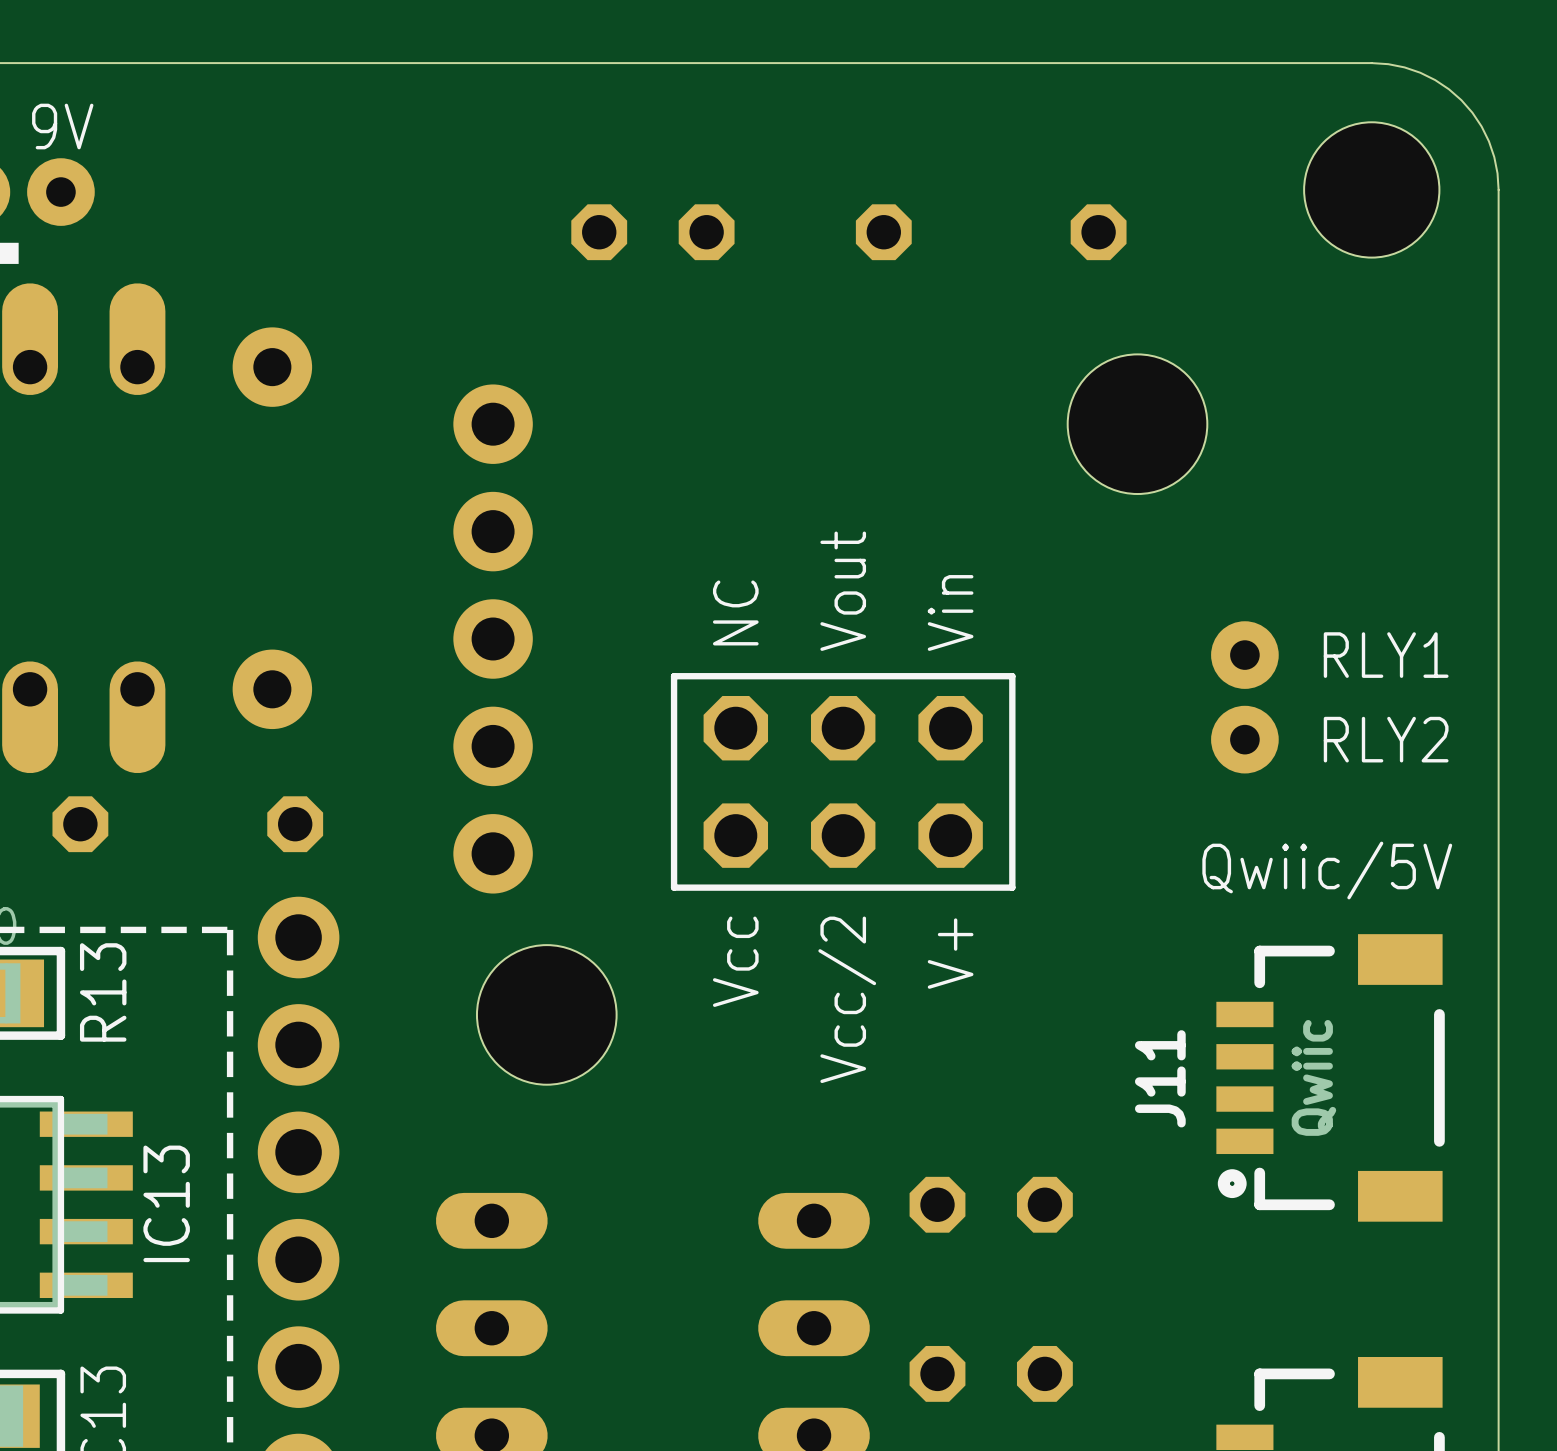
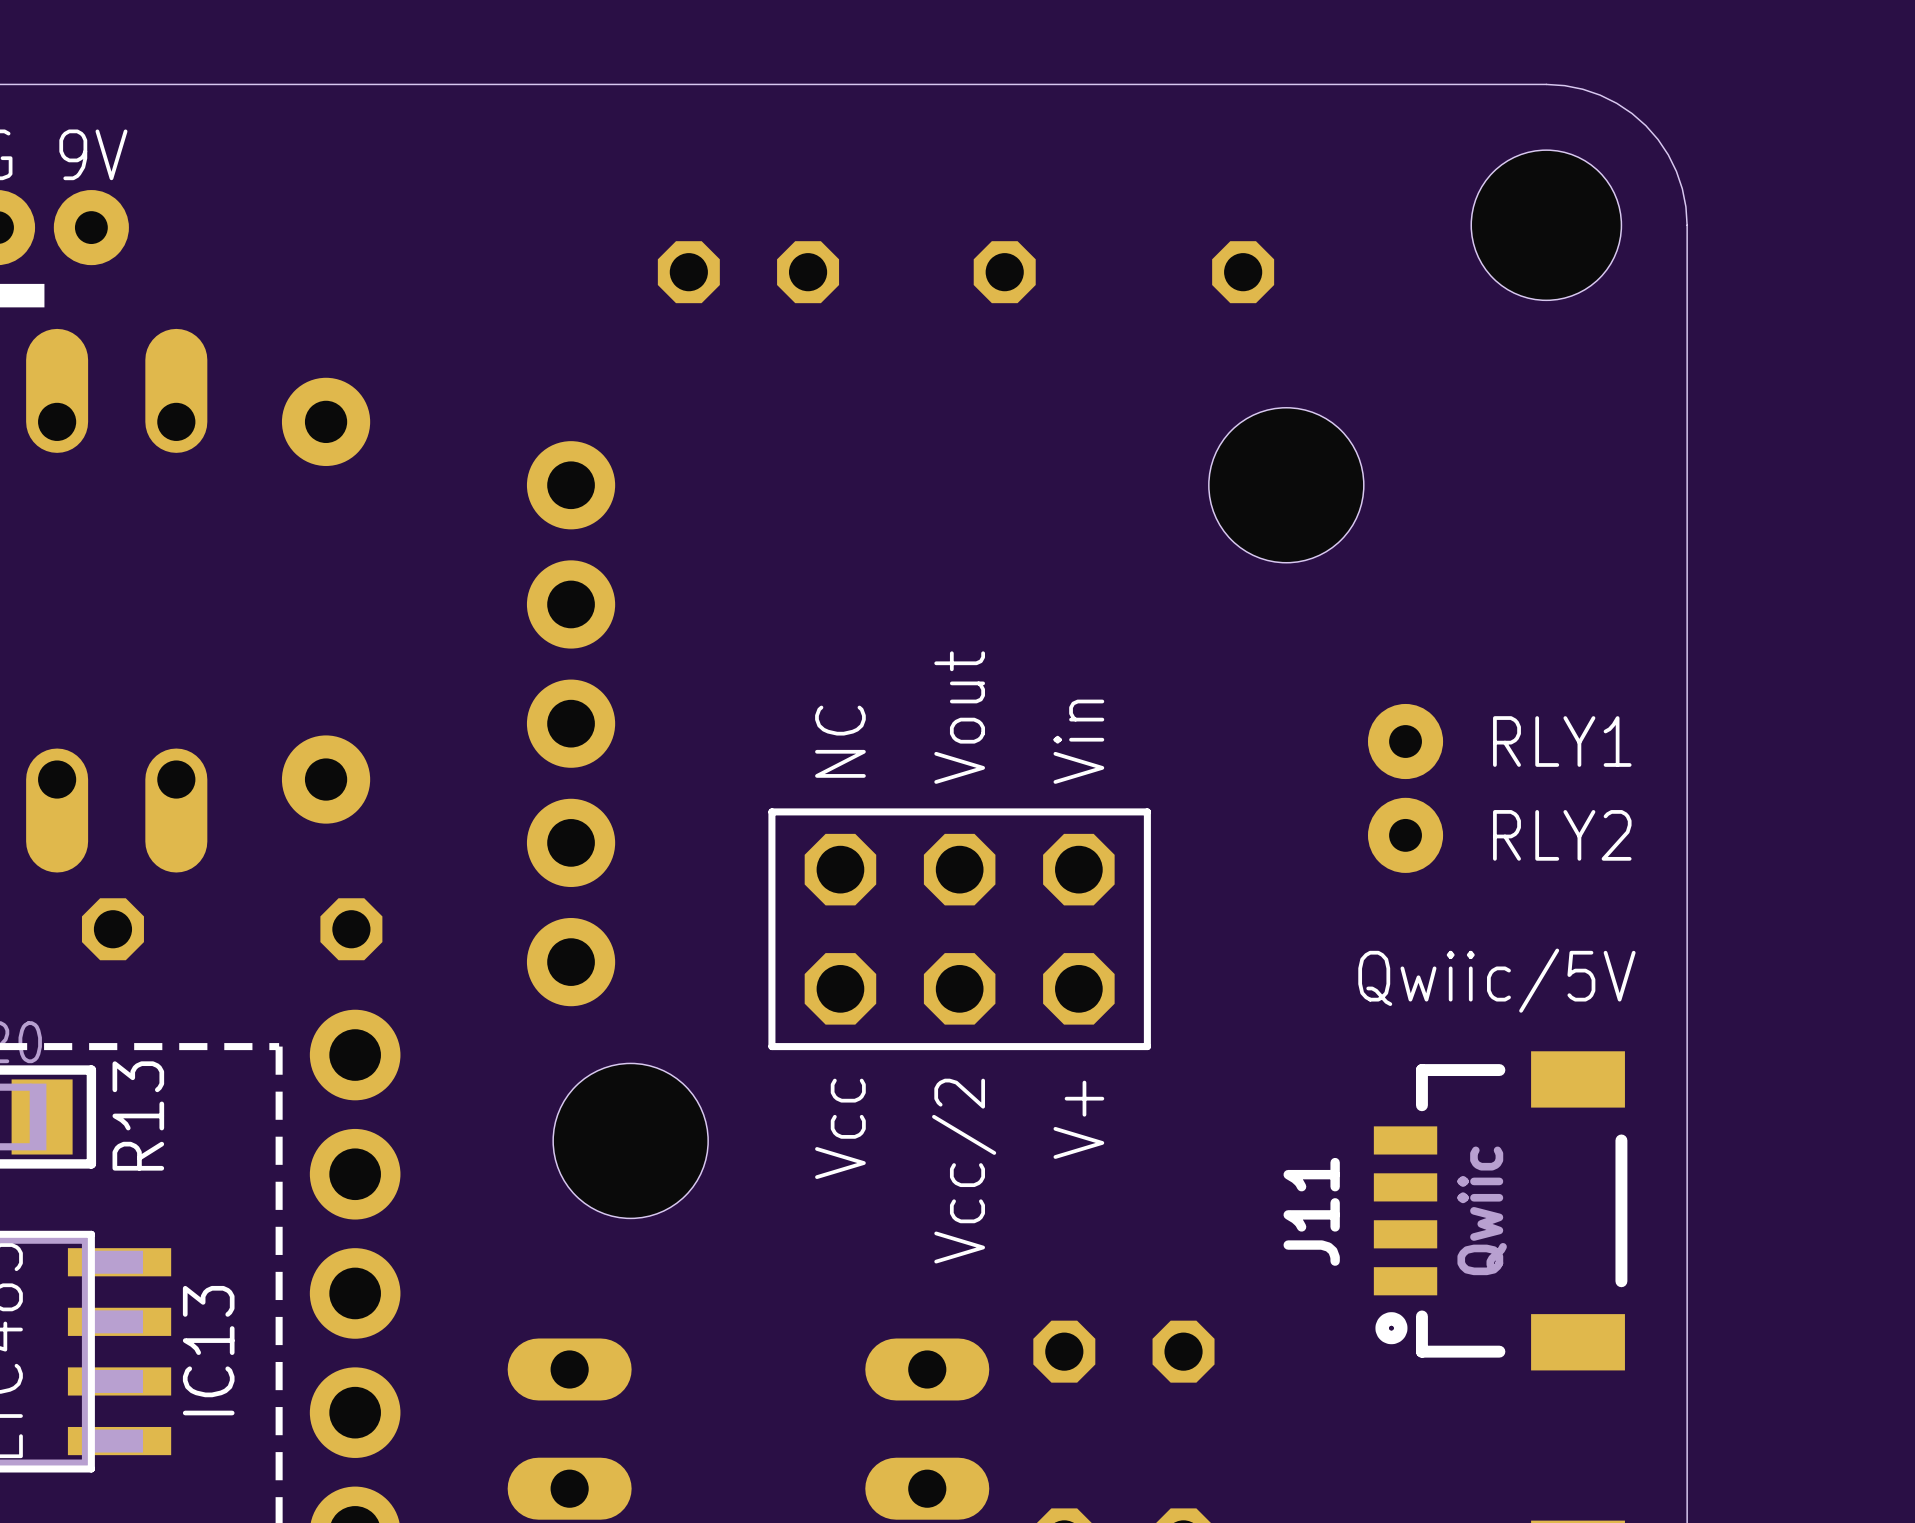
text position: Vout (843, 591) -> Vout (959, 717)
text position: NC (735, 612) -> NC (840, 741)
text position: Vin (950, 612) -> Vin (1078, 741)
line: (1012, 718) (1012, 676) (674, 676) (674, 718) -> (1147, 811) (771, 811)
part position: (843, 781) -> (959, 929)
line: (1012, 887) (674, 887) -> (1147, 999) (1147, 1046) (771, 1046) (771, 999)
text position: V+ (950, 953) -> V+ (1078, 1119)
text position: Vcc (735, 961) -> Vcc (840, 1128)
text position: Vcc/2 (847, 999) -> Vcc/2 (964, 1171)

